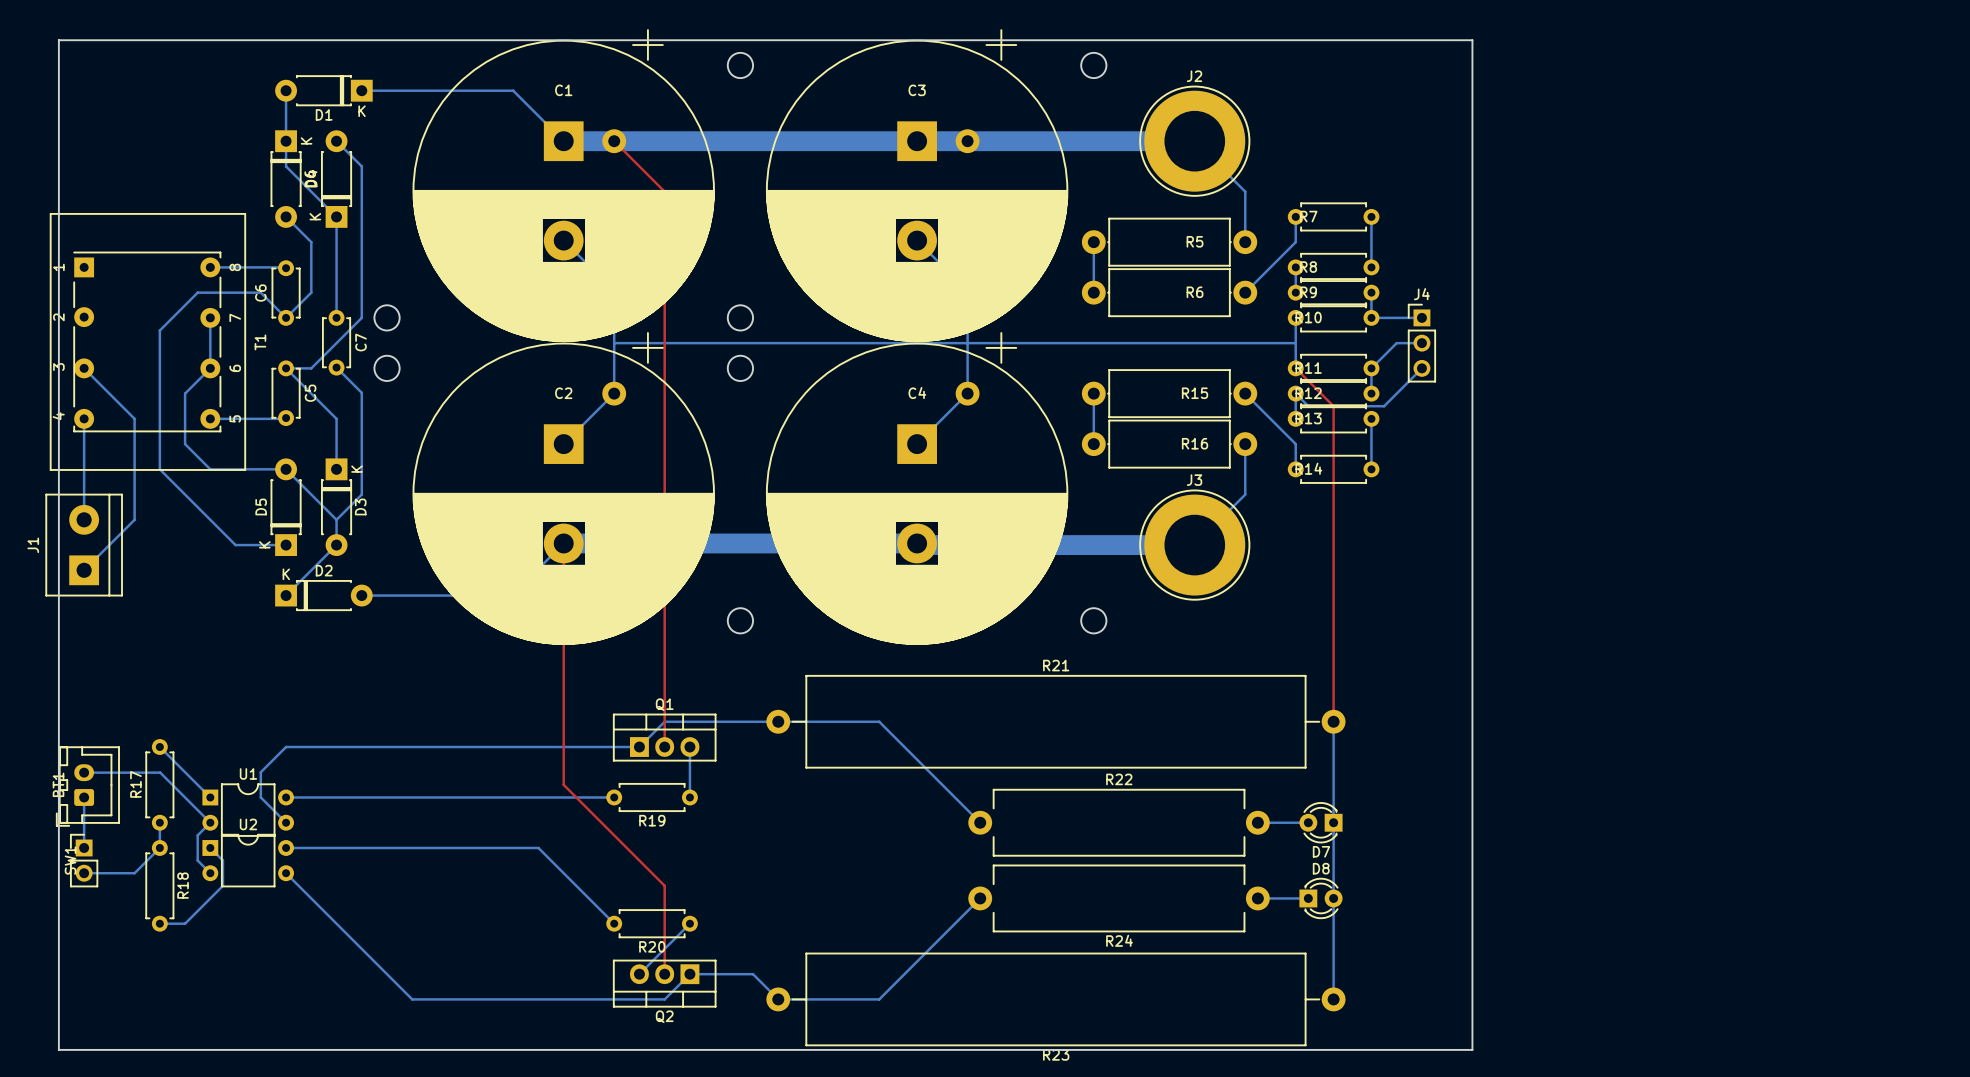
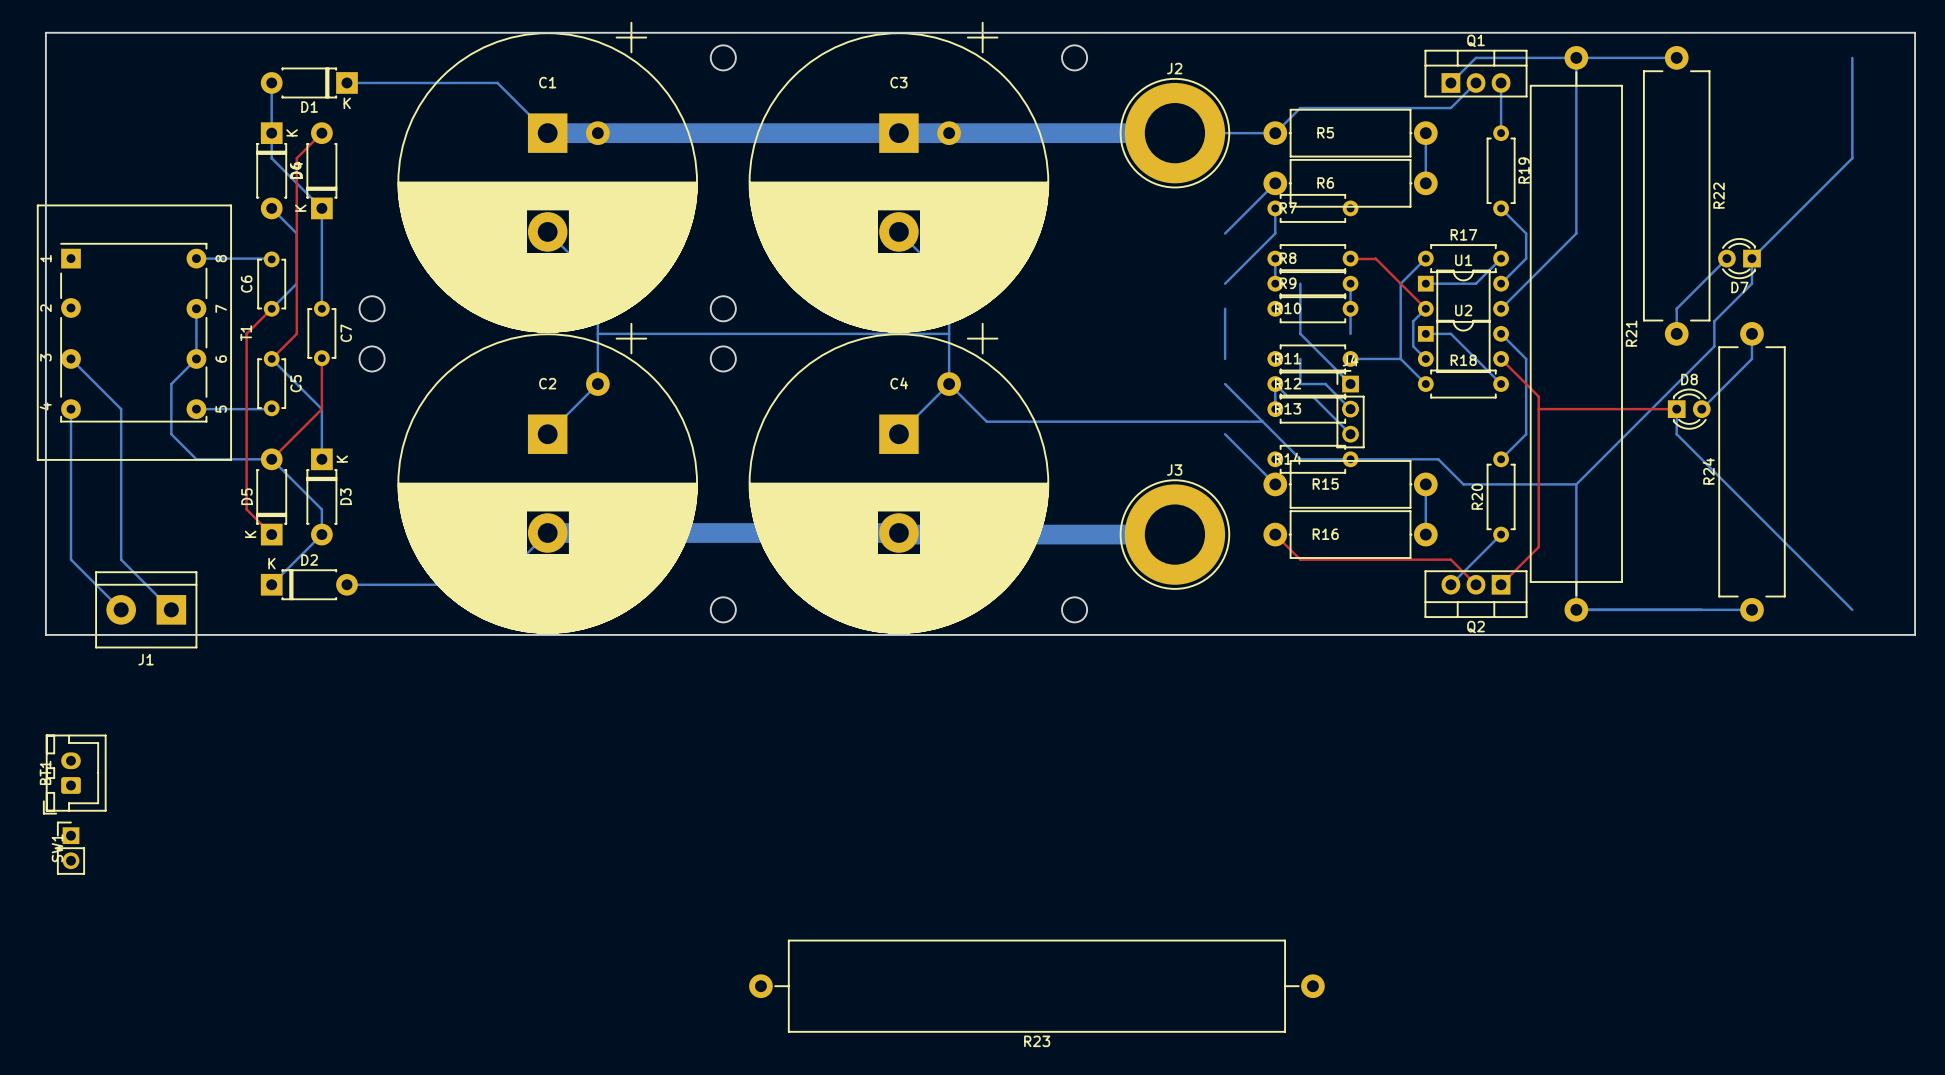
board edge: (1472, 40) (1472, 1049) (58, 1049) (58, 646) -> (1450, 32) (1915, 32) (1915, 634) (45, 634)
bottom track: none -> (1576, 57) (1576, 233) (1501, 308)
bottom track: none -> (1676, 57) (1476, 57) (1450, 82)
bottom track: none -> (1852, 57) (1852, 158) (1751, 258) (1751, 283) (1714, 321) (1714, 346) (1576, 484)
bottom track: none -> (1476, 82) (1450, 108) (1300, 108) (1275, 133) (1174, 133)
bottom track: none -> (1501, 82) (1501, 133)
bottom track: (336, 141) (361, 166) (361, 317) (311, 368) (286, 368) -> none
top track: none -> (321, 133) (296, 158) (296, 333) (271, 358)
top track: (614, 141) (664, 191) (664, 747) -> none
bottom track: (1194, 141) (1245, 191) (1245, 242) -> (1275, 183) (1225, 233)
bottom track: (1371, 216) (1371, 267) -> (1425, 133) (1425, 183)
bottom track: none -> (1501, 208) (1526, 233) (1526, 258) (1501, 283)
R5 name position: R5 (1195, 241) -> R5 (1325, 132)
bottom track: (1093, 242) (1093, 292) -> none
R5 position: (1169, 242) -> (1350, 133)
top track: none -> (1350, 258) (1375, 258) (1425, 308)
bottom track: none -> (1425, 258) (1400, 283) (1400, 358)
bottom track: none -> (1501, 258) (1476, 283) (1425, 283)
bottom track: none -> (1726, 258) (1676, 308) (1676, 333)
R6 position: (1169, 292) -> (1350, 183)
R6 name position: R6 (1195, 292) -> R6 (1325, 182)
bottom track: (286, 317) (260, 292) (197, 292) (159, 330) (159, 469) (235, 545) (286, 545) -> none
top track: none -> (271, 308) (246, 333) (246, 509) (271, 534)
bottom track: (1295, 317) (1295, 368) -> (1225, 308) (1225, 358)
bottom track: (1371, 317) (1421, 317) -> (1350, 308) (1350, 333)
bottom track: none -> (1425, 308) (1413, 321) (1413, 346) (1425, 358)
bottom track: (967, 343) (1295, 343) -> none
bottom track: (1421, 343) (1396, 343) (1371, 368) (1371, 393) -> (1300, 283) (1300, 333) (1350, 384)
J4 position: (1421, 343) -> (1350, 409)
bottom track: none -> (1425, 333) (1450, 333) (1501, 384)
bottom track: none -> (1501, 333) (1526, 358) (1526, 434) (1501, 459)
bottom track: none -> (1751, 333) (1751, 358) (1701, 409)
bottom track: (336, 367) (361, 392) (361, 494) (336, 519) -> none
top track: none -> (321, 358) (321, 409) (271, 459)
top track: (1295, 368) (1333, 406) (1333, 721) -> none
bottom track: (1421, 368) (1384, 406) (1333, 406) -> (1400, 358) (1350, 358)
bottom track: none -> (1400, 358) (1425, 384)
top track: none -> (1501, 358) (1538, 396) (1538, 547) (1501, 584)
bottom track: none -> (949, 384) (986, 421) (1262, 421)
bottom track: (1093, 393) (1093, 444) -> none
R15 position: (1169, 393) -> (1350, 484)
R15 name position: R15 (1195, 393) -> R15 (1325, 484)
bottom track: none -> (1312, 396) (1350, 434)
bottom track: (1371, 418) (1371, 469) -> (1350, 409) (1325, 384) (1300, 384) (1300, 358)
top track: none -> (1538, 409) (1676, 409)
bottom track: none -> (1676, 409) (1676, 434) (1852, 609)
R16 name position: R16 (1195, 443) -> R16 (1325, 534)
R16 position: (1169, 444) -> (1350, 534)
bottom track: (1245, 444) (1245, 494) (1194, 545) -> (1225, 434) (1275, 484)
bottom track: (1295, 444) (1295, 469) -> (1275, 434) (1300, 459) (1438, 459) (1463, 484) (1576, 484)
bottom track: none -> (1425, 484) (1425, 534)
bottom track: none -> (1576, 484) (1576, 609) (1751, 609)
bottom track: none -> (70, 509) (70, 559) (121, 609)
bottom track: (134, 519) (84, 570) -> (121, 509) (121, 559) (171, 609)
top track: (563, 543) (563, 784) (664, 885) (664, 974) -> none
J1 rotation: 0° (84, 545) -> 90° counterclockwise (146, 609)
J1 position: (84, 545) -> (146, 609)
top track: none -> (1275, 534) (1300, 559) (1450, 559) (1476, 584)
bottom track: none -> (1501, 534) (1450, 584)
R21 rotation: 0° (1055, 721) -> 90° clockwise (1576, 333)
R21 position: (1055, 721) -> (1576, 333)
bottom track: (1333, 721) (1333, 999) -> none
Q1 position: (664, 737) -> (1476, 73)
bottom track: (159, 747) (210, 797) -> none
bottom track: (689, 747) (689, 797) -> none
bottom track: (84, 772) (160, 772) (210, 822) (197, 835) (197, 860) (210, 873) -> none
R17 rotation: 0° (159, 784) -> 90° clockwise (1463, 258)
R17 position: (159, 784) -> (1463, 258)
bottom track: (84, 797) (84, 847) -> none
bottom track: (286, 797) (614, 797) -> none
R19 rotation: 0° (652, 797) -> 90° clockwise (1501, 170)
R19 position: (652, 797) -> (1501, 170)
U1 position: (248, 810) -> (1463, 296)
R19 name position: R19 (652, 820) -> R19 (1524, 170)
bottom track: (159, 822) (159, 847) (134, 873) (84, 873) -> none
bottom track: (286, 822) (260, 797) (260, 772) (286, 747) (639, 747) (664, 721) (879, 721) (980, 822) -> none
R22 rotation: 0° (1119, 822) -> 90° clockwise (1676, 195)
R22 position: (1119, 822) -> (1676, 195)
bottom track: (1257, 822) (1308, 822) -> none
D7 position: (1320, 822) -> (1739, 258)
bottom track: (210, 847) (222, 860) (222, 885) (185, 923) (159, 923) -> none
bottom track: (286, 847) (538, 847) (614, 923) -> none
U2 position: (248, 860) -> (1463, 346)
bottom track: (286, 873) (412, 999) (664, 999) (689, 974) (753, 974) (778, 999) (879, 999) (980, 898) -> none
R18 rotation: 0° (159, 885) -> 90° clockwise (1463, 384)
R18 position: (159, 885) -> (1463, 384)
R18 name position: R18 (183, 885) -> R18 (1463, 360)
R24 rotation: 0° (1119, 898) -> 90° clockwise (1751, 471)
R24 position: (1119, 898) -> (1751, 471)
bottom track: (1257, 898) (1308, 898) -> none
D8 position: (1320, 898) -> (1689, 409)
R20 rotation: 0° (652, 923) -> 90° clockwise (1501, 496)
R20 position: (652, 923) -> (1501, 496)
bottom track: (689, 923) (639, 974) -> none
Q2 position: (664, 983) -> (1476, 594)

